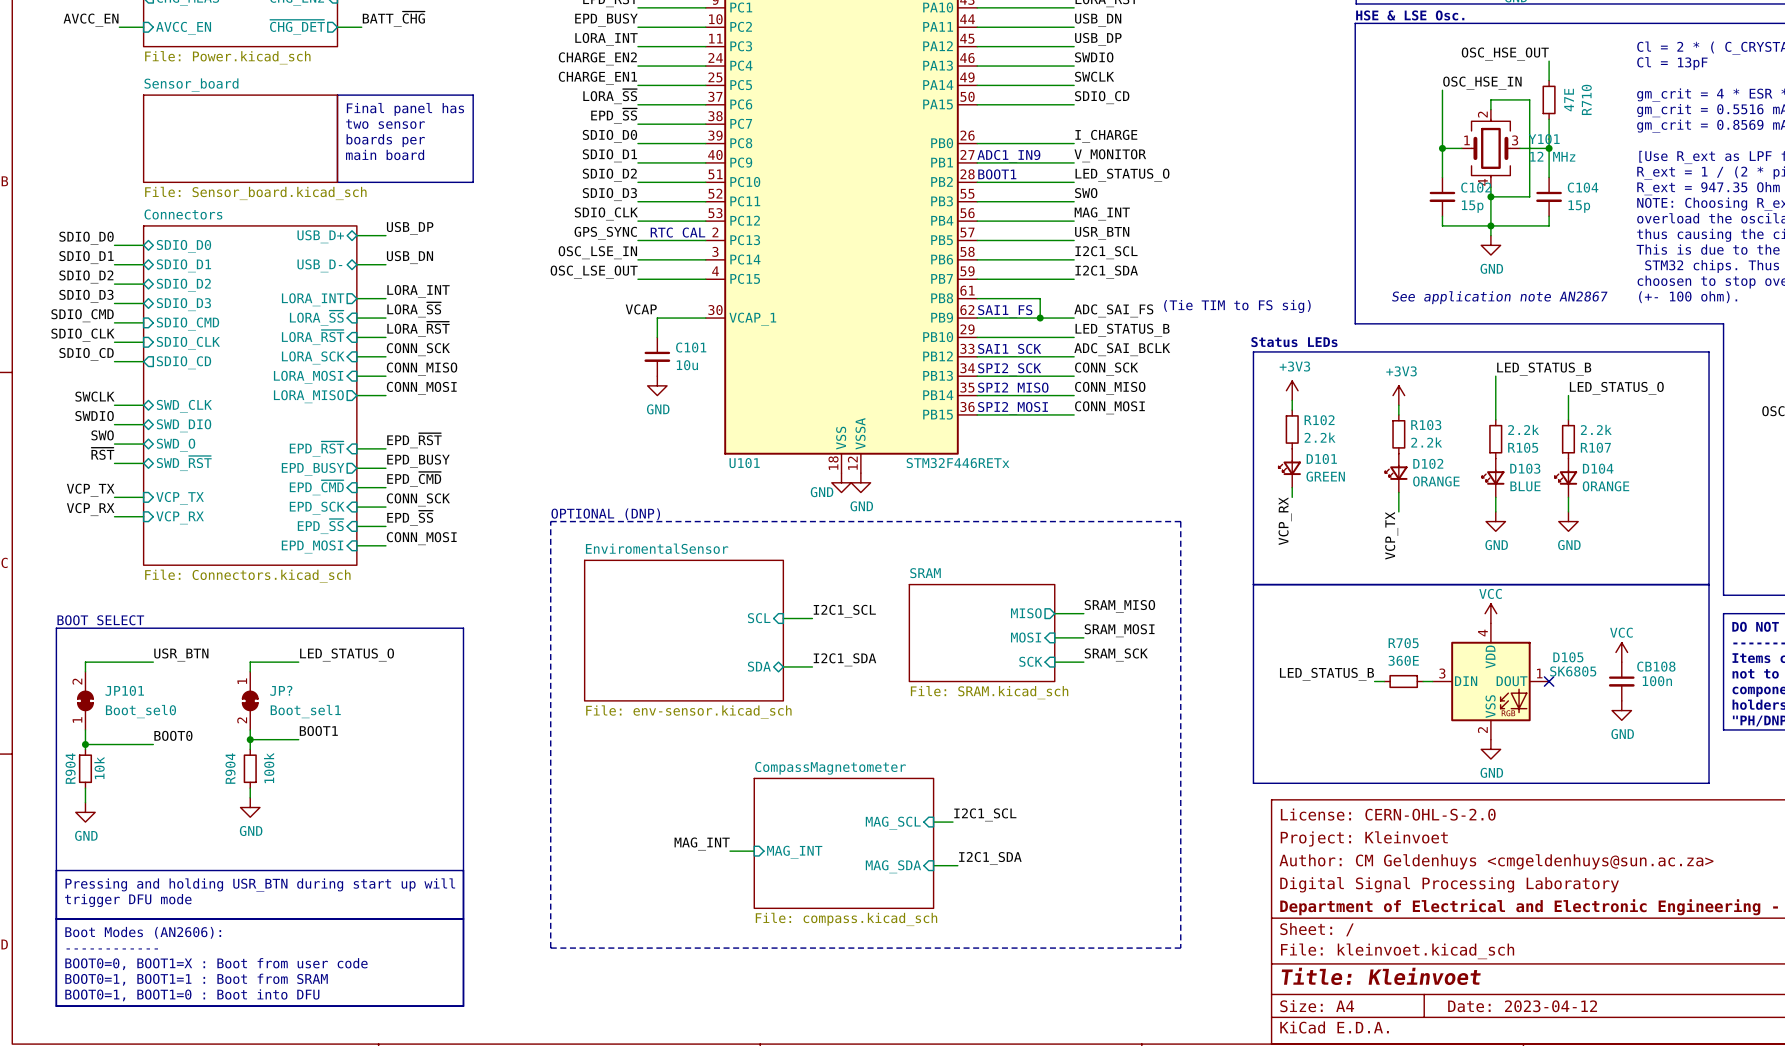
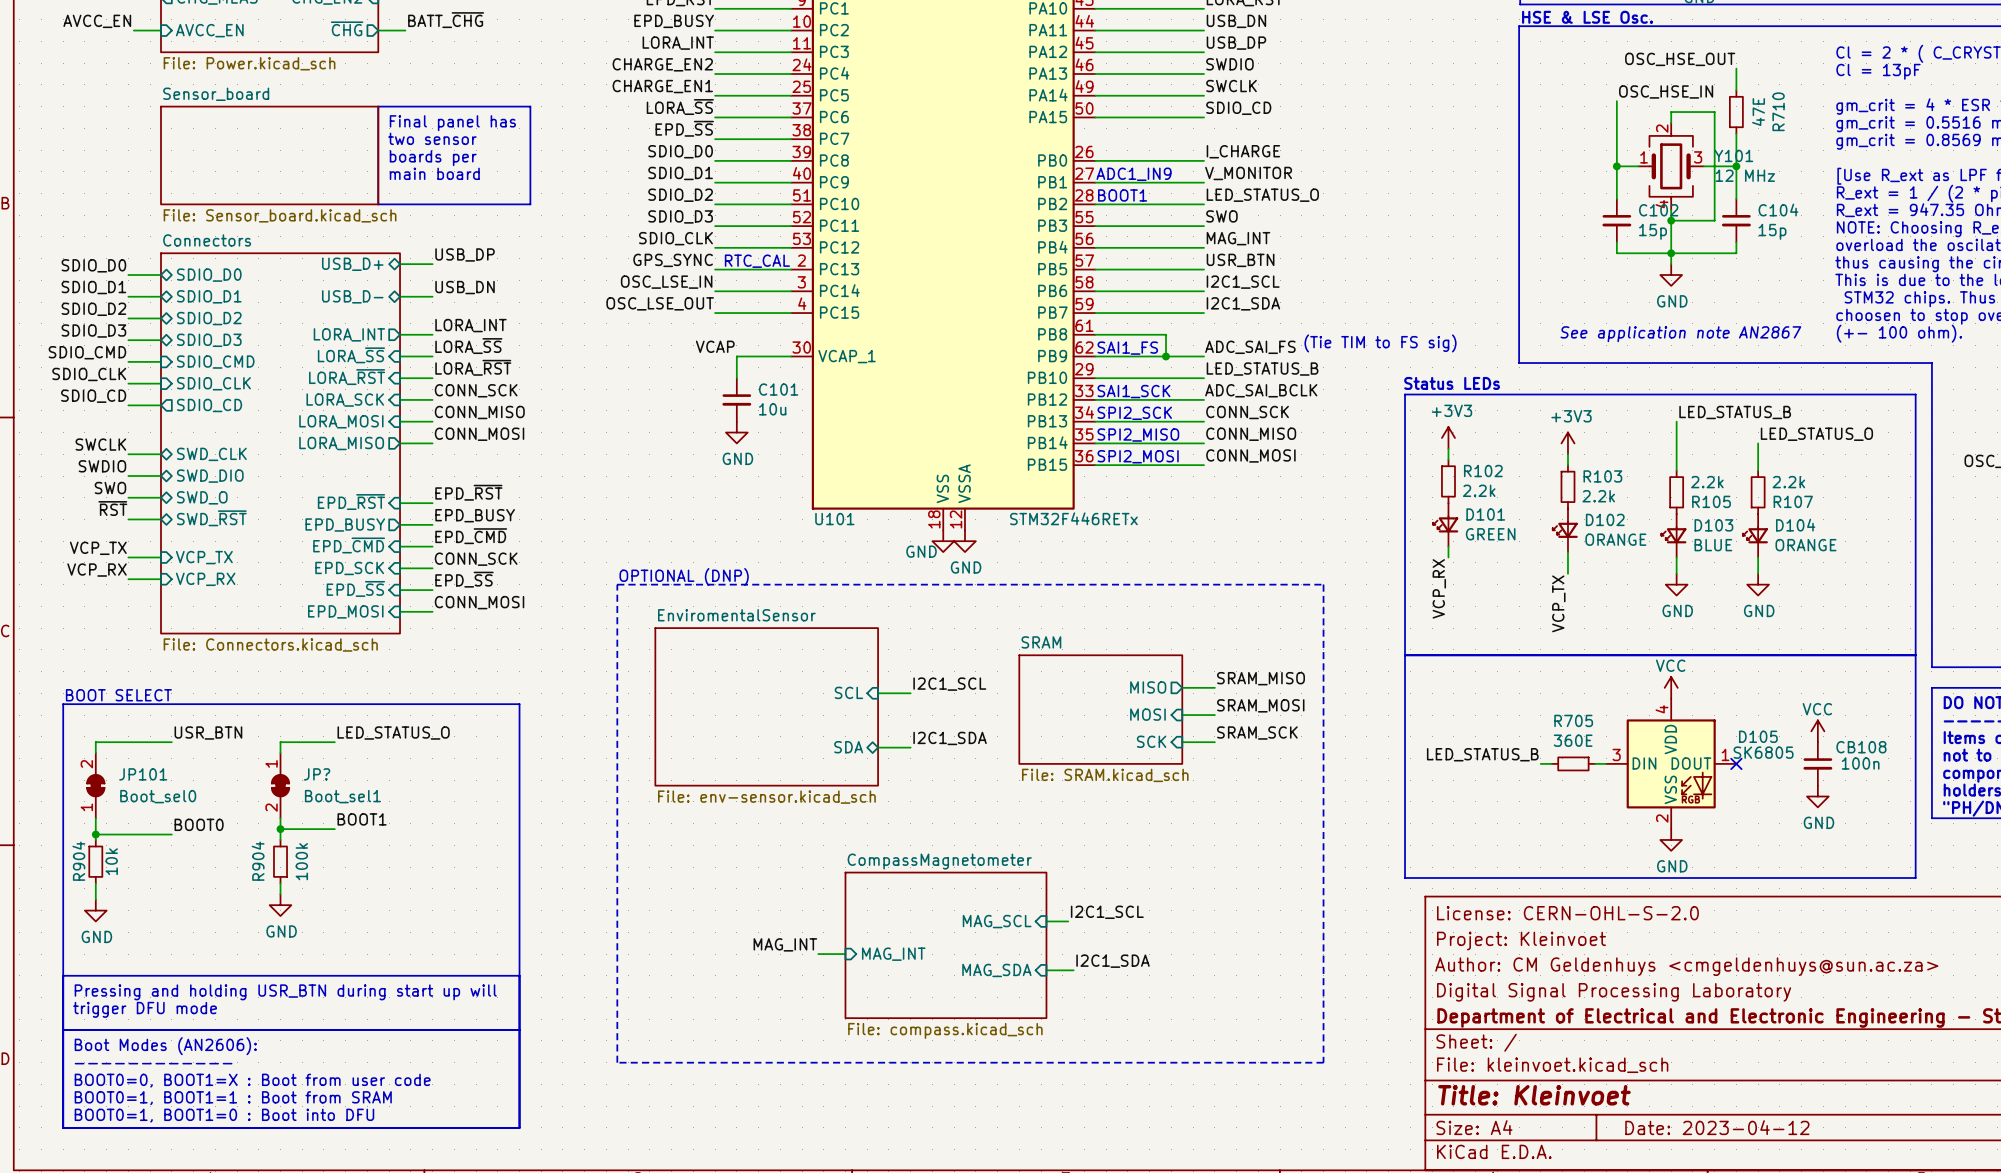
sheet pin: ~{CHG_DET} (297, 27) -> ~{CHG} (347, 28)

